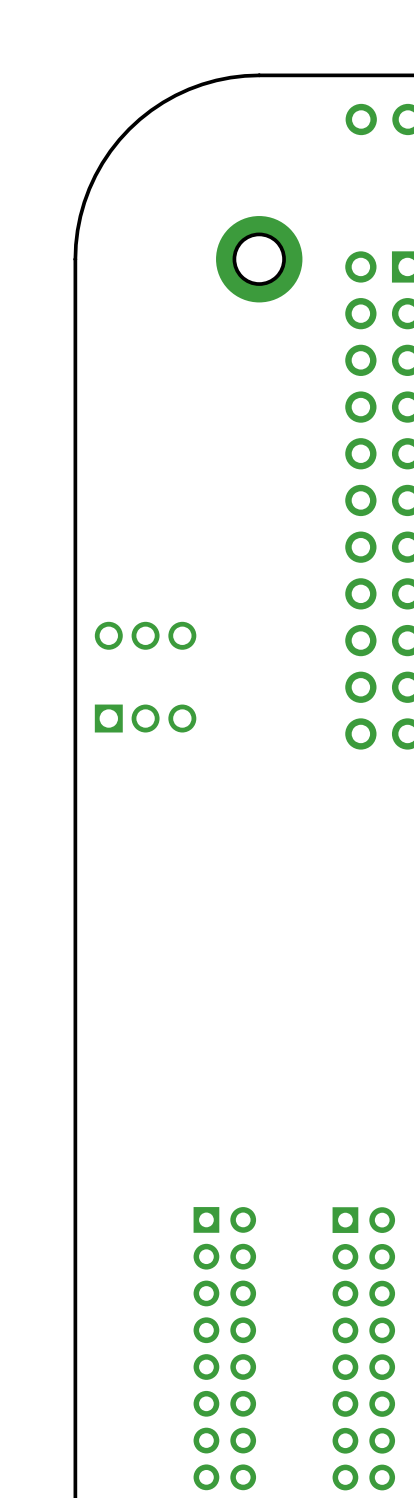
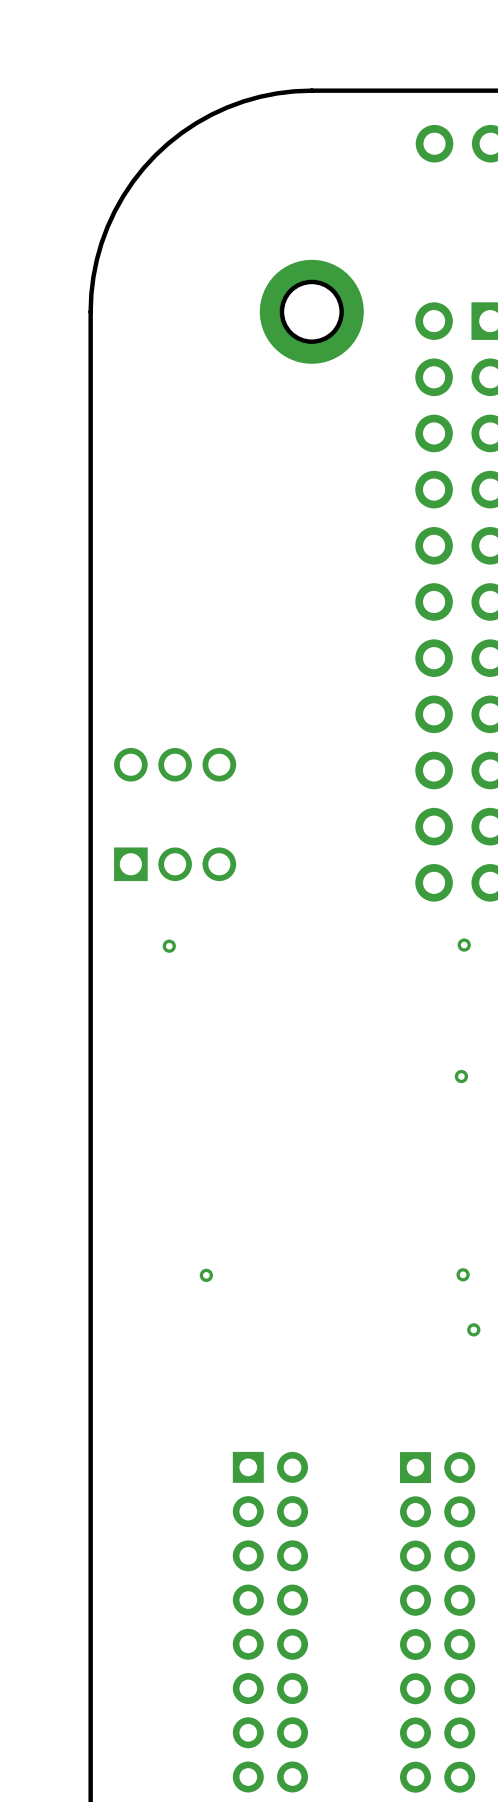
via: none -> (464, 945)
via: none -> (169, 946)
via: none -> (461, 1076)
via: none -> (463, 1274)
via: none -> (206, 1275)
via: none -> (473, 1329)

